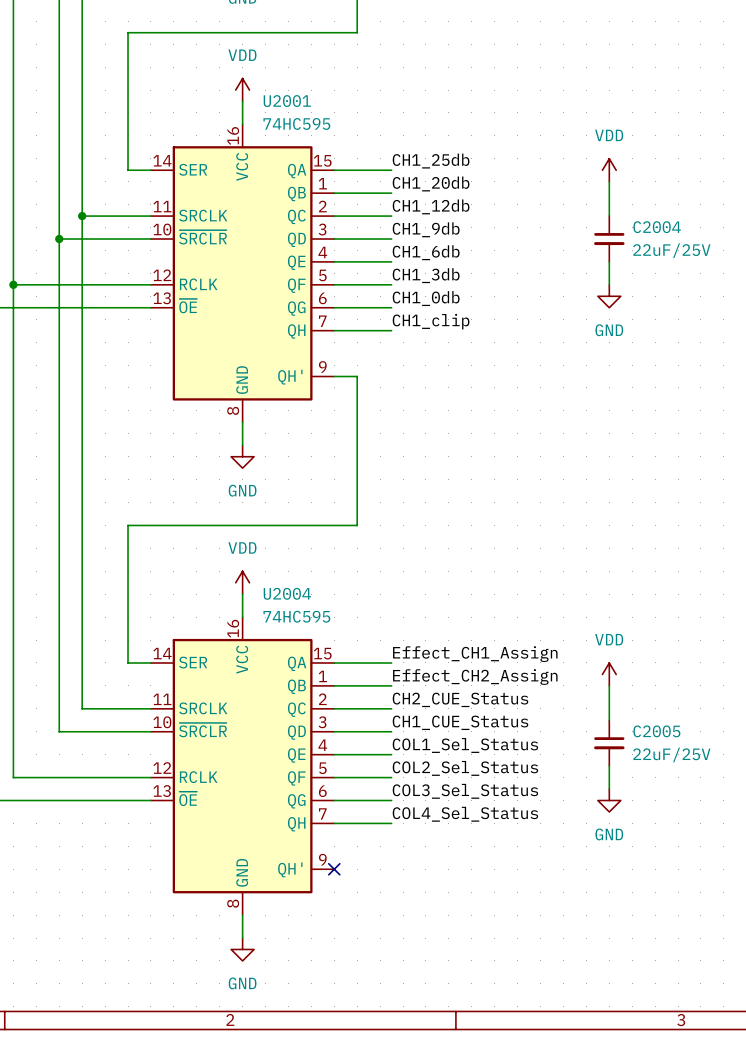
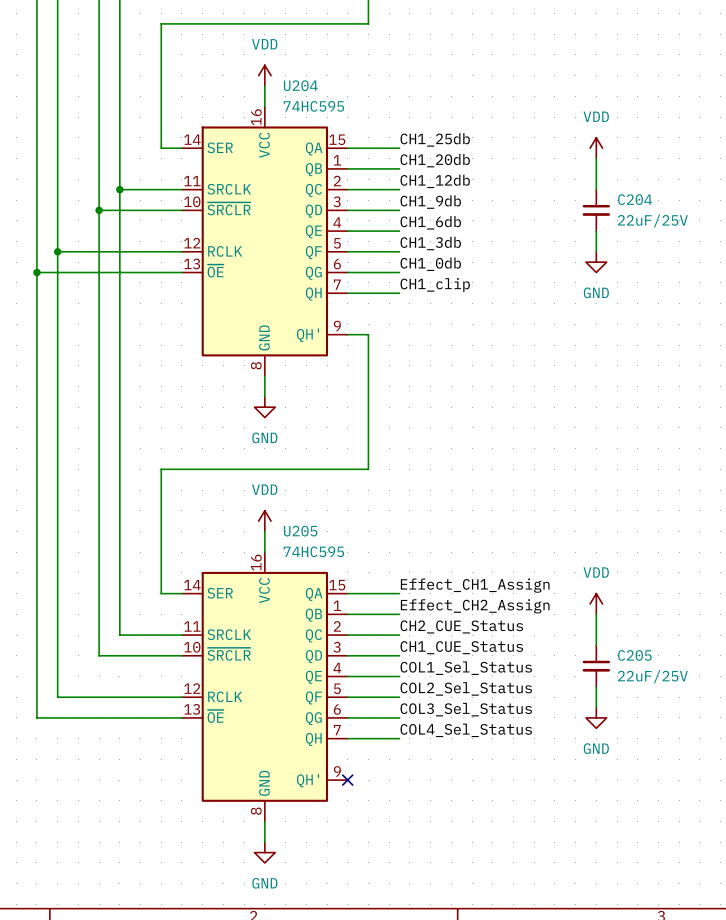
U2001 name: U2001 (287, 101) -> U204 (300, 85)
C2004 name: C2004 (657, 227) -> C204 (635, 199)
U2004 name: U2004 (287, 593) -> U205 (300, 531)
C2005 name: C2005 (656, 731) -> C205 (634, 655)

